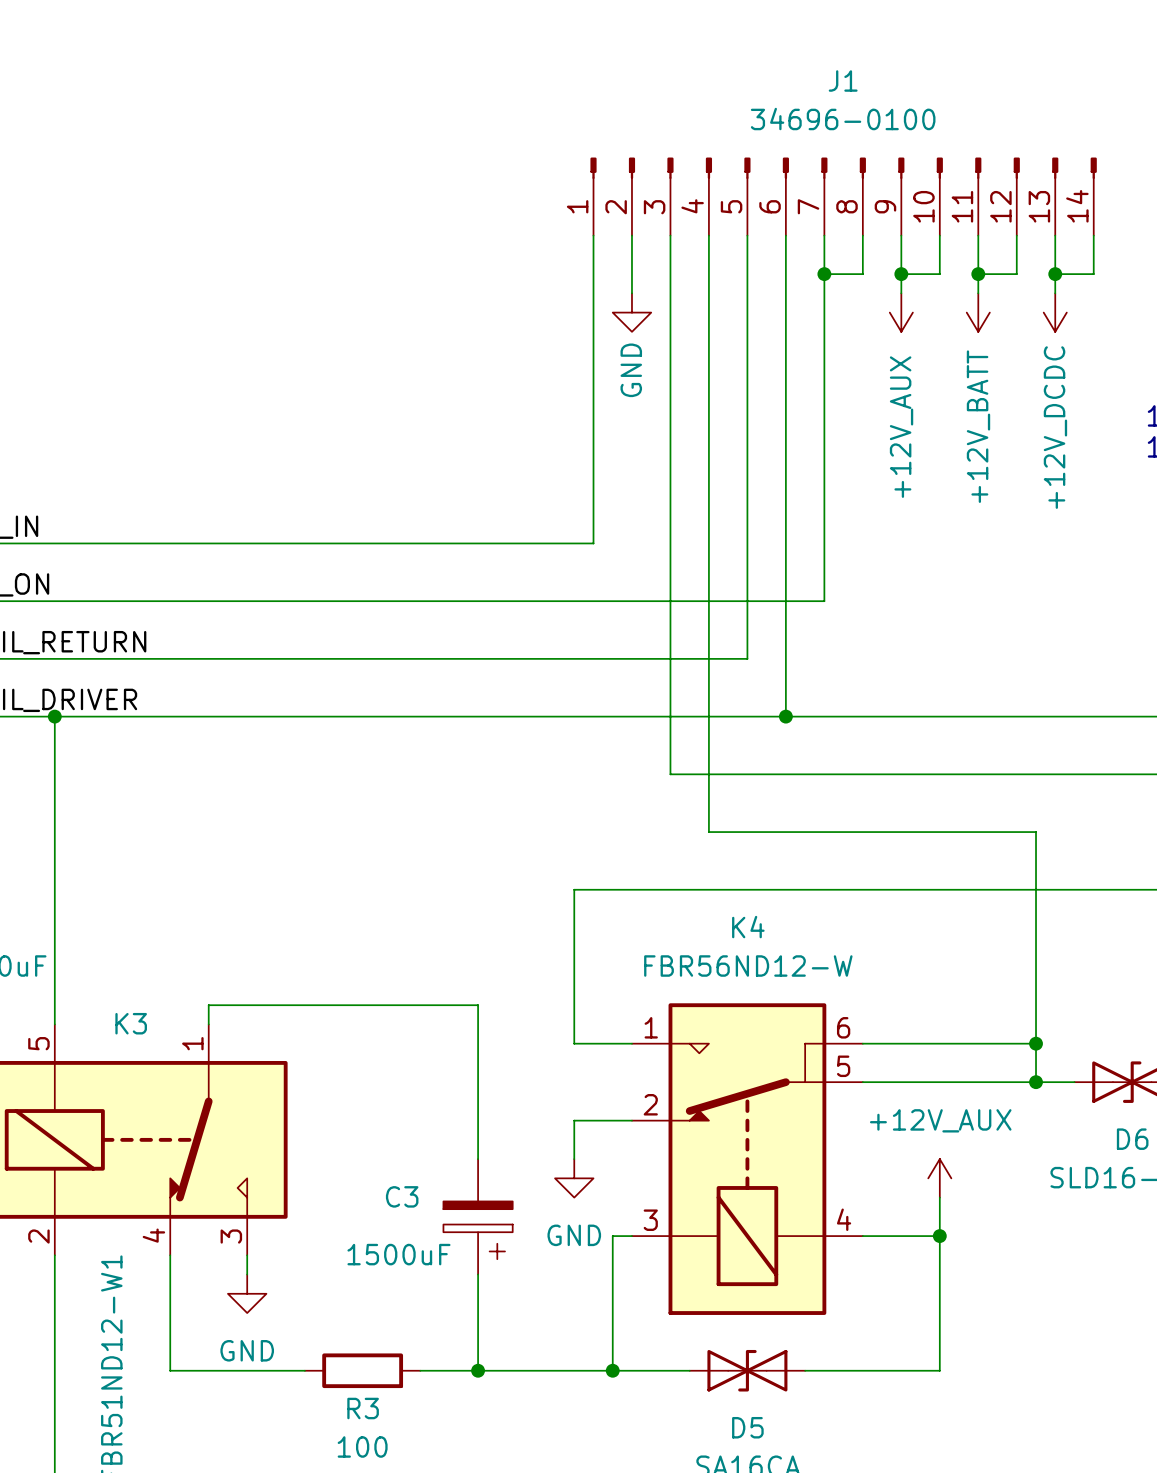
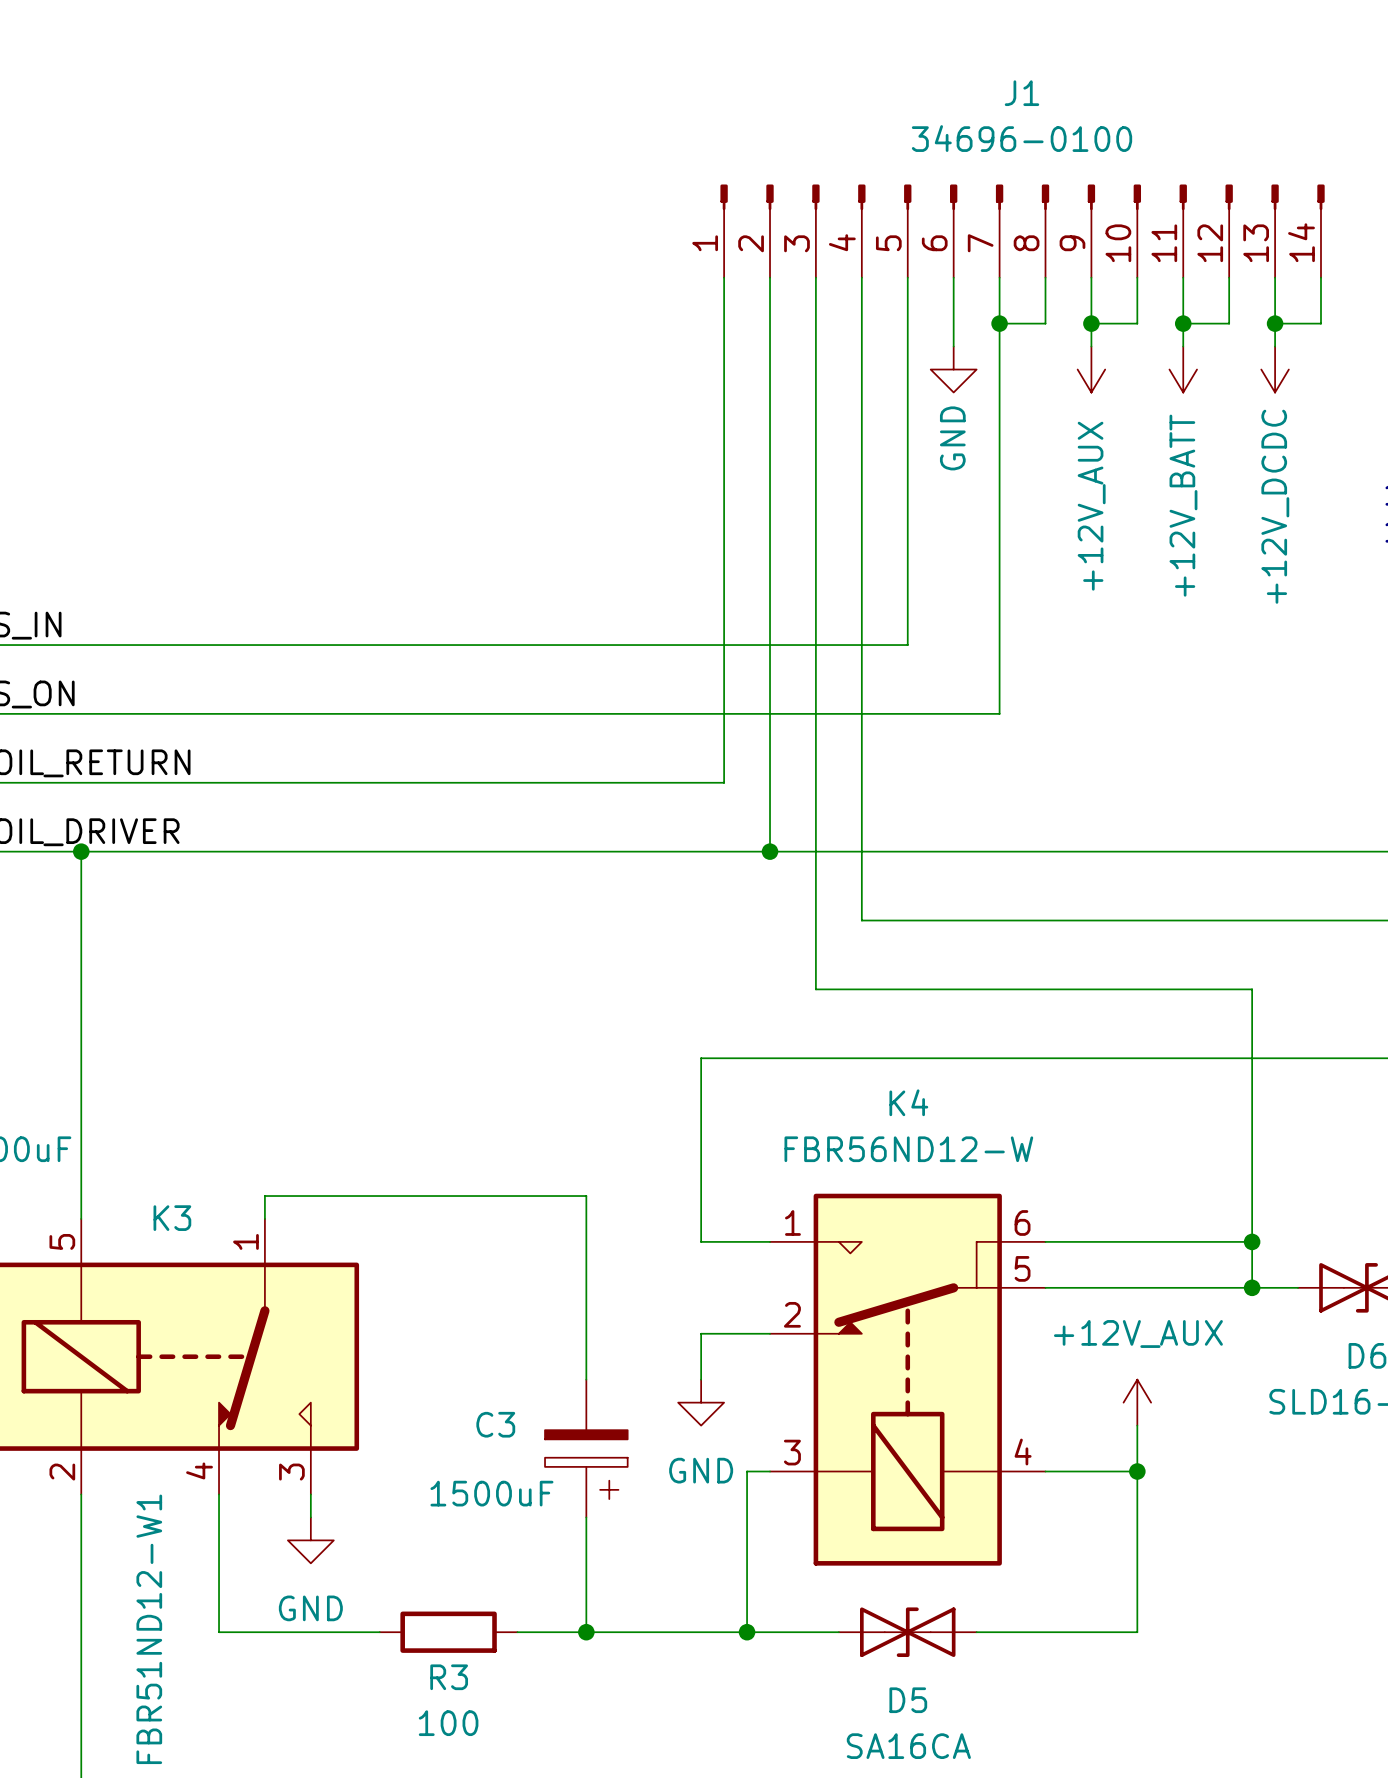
wire: (785, 293) (785, 716) -> (770, 346) (770, 851)
power symbol position: GND (631, 312) -> GND (953, 369)
wire: (747, 543) (747, 658) (593, 658) -> (907, 645) (724, 645) (724, 782)
junction: none -> (770, 851)
junction: (785, 716) -> none
wire: (670, 774) (708, 774) (708, 832) -> (815, 920) (815, 989) (861, 989)

